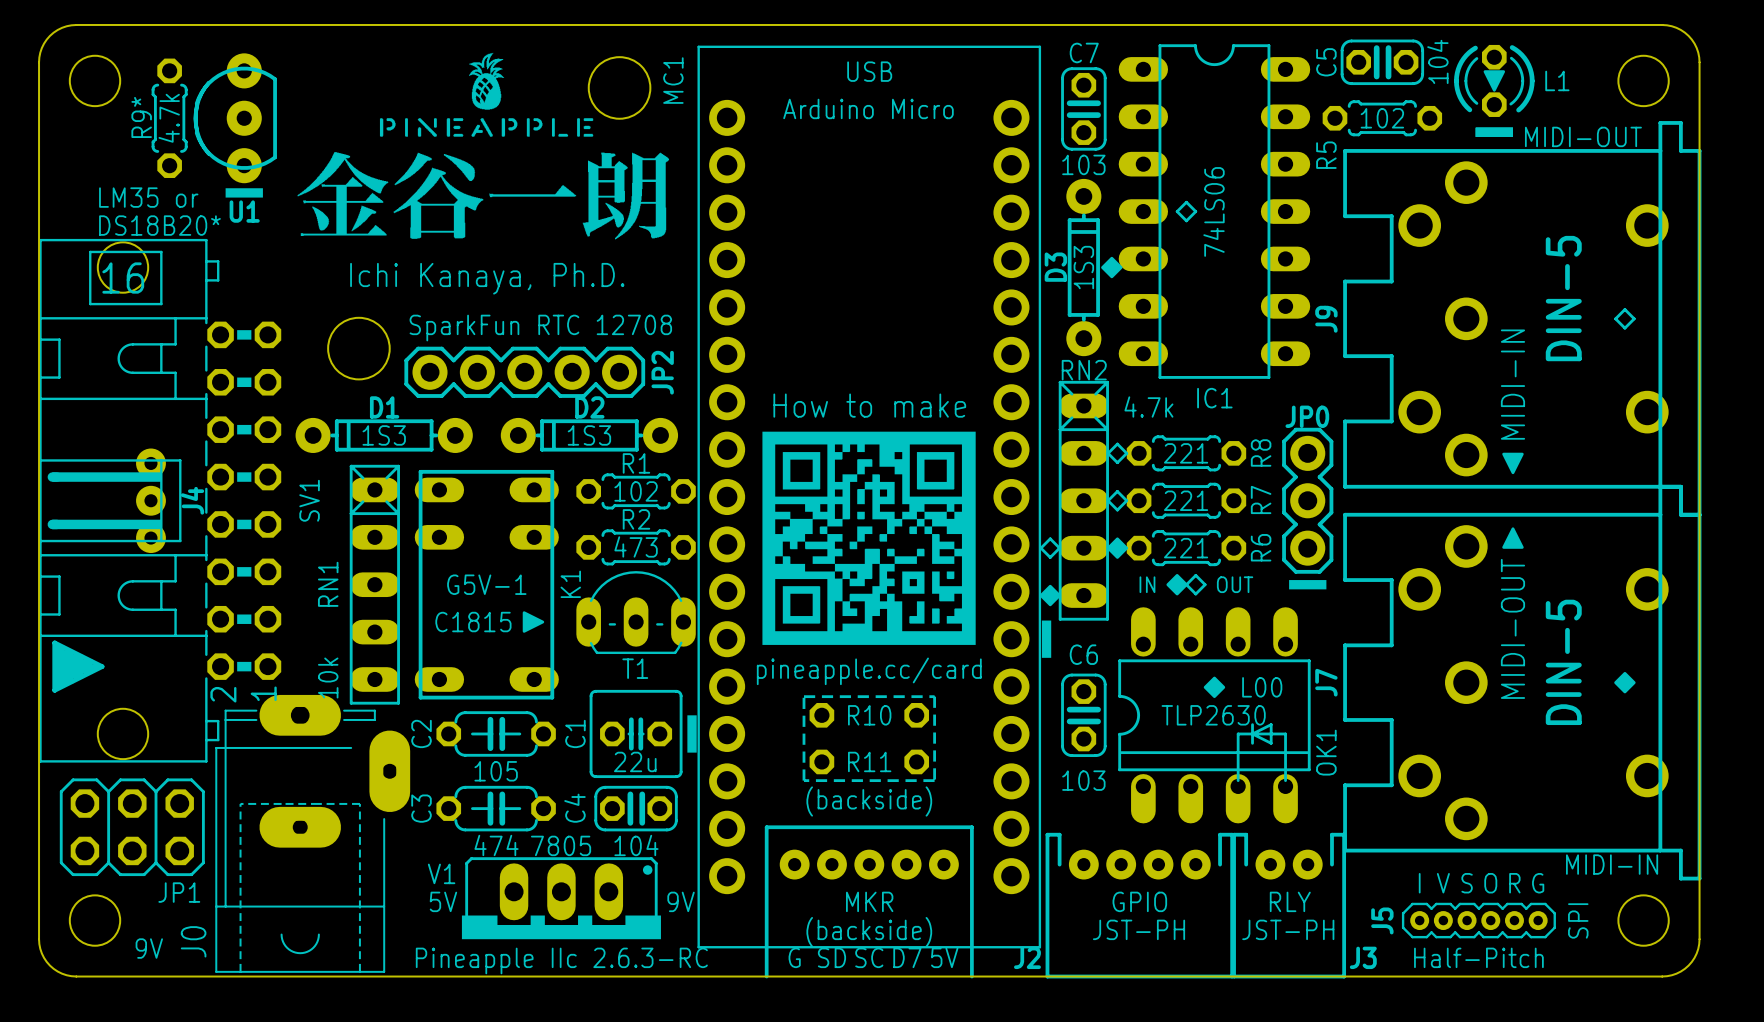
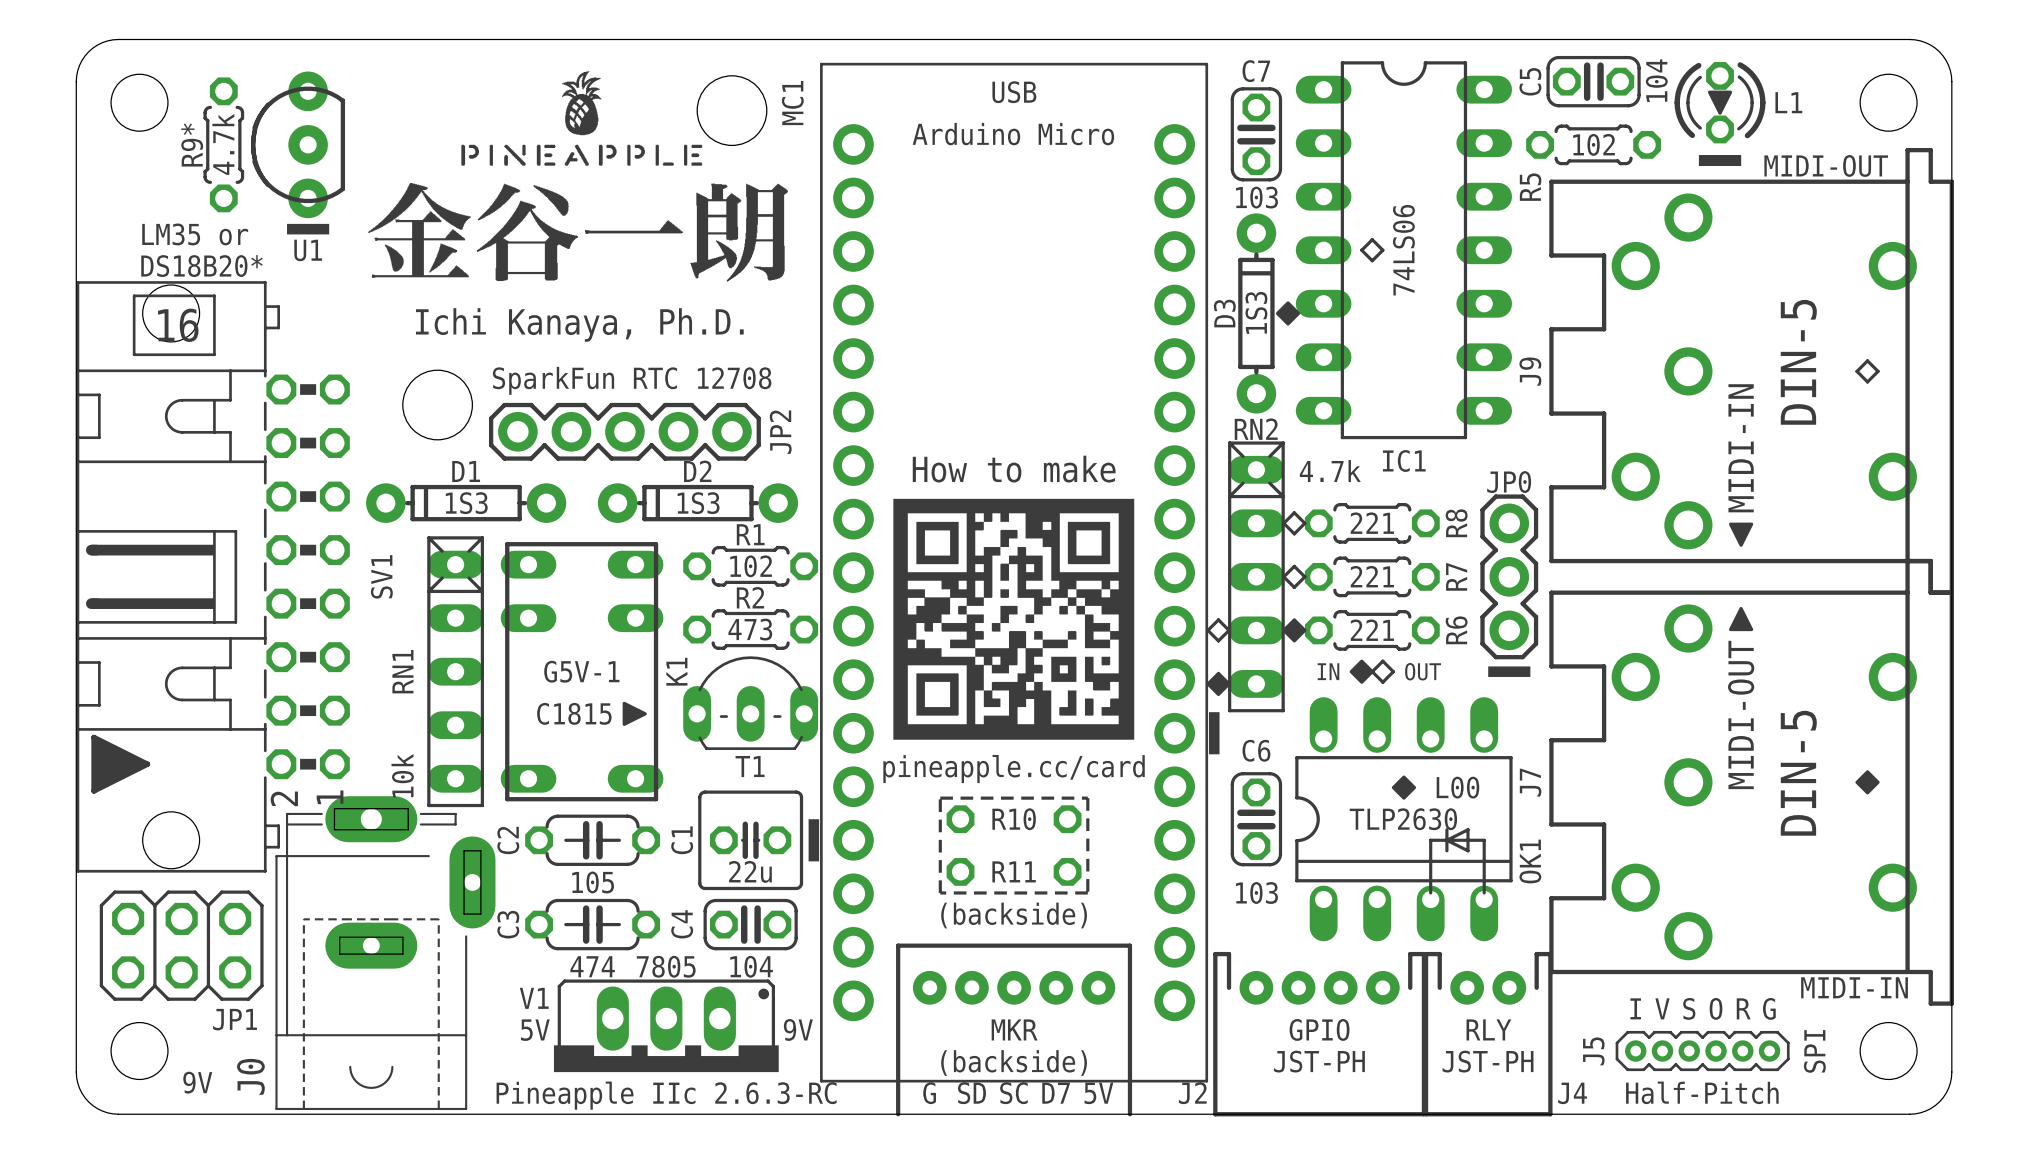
J4: (150, 500) -> none
J3 name: J3 (1363, 957) -> J4 (1572, 1093)

